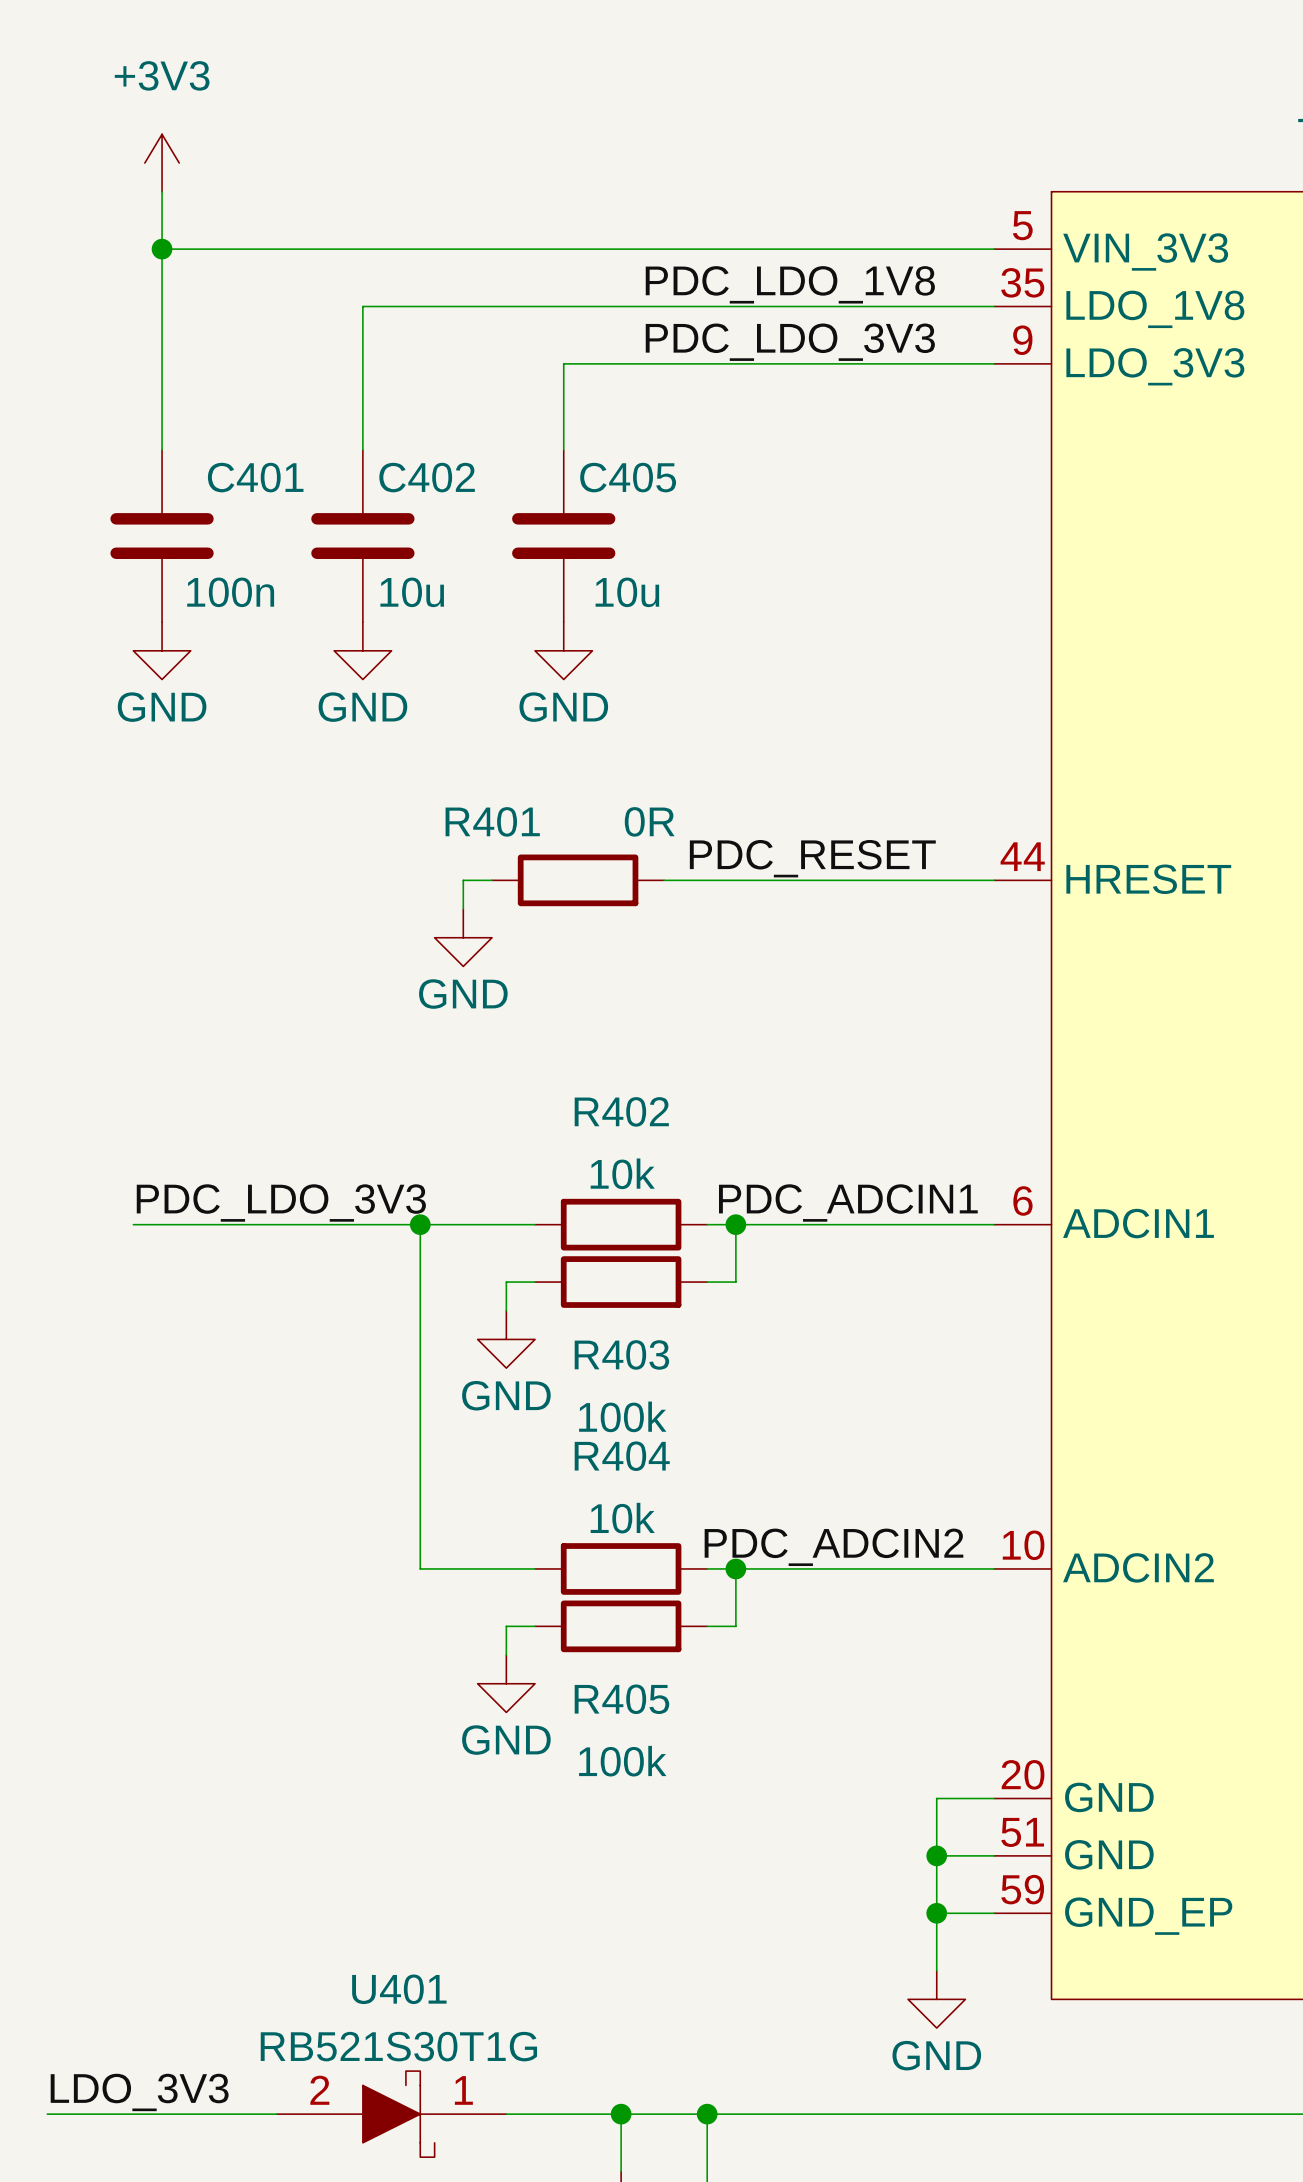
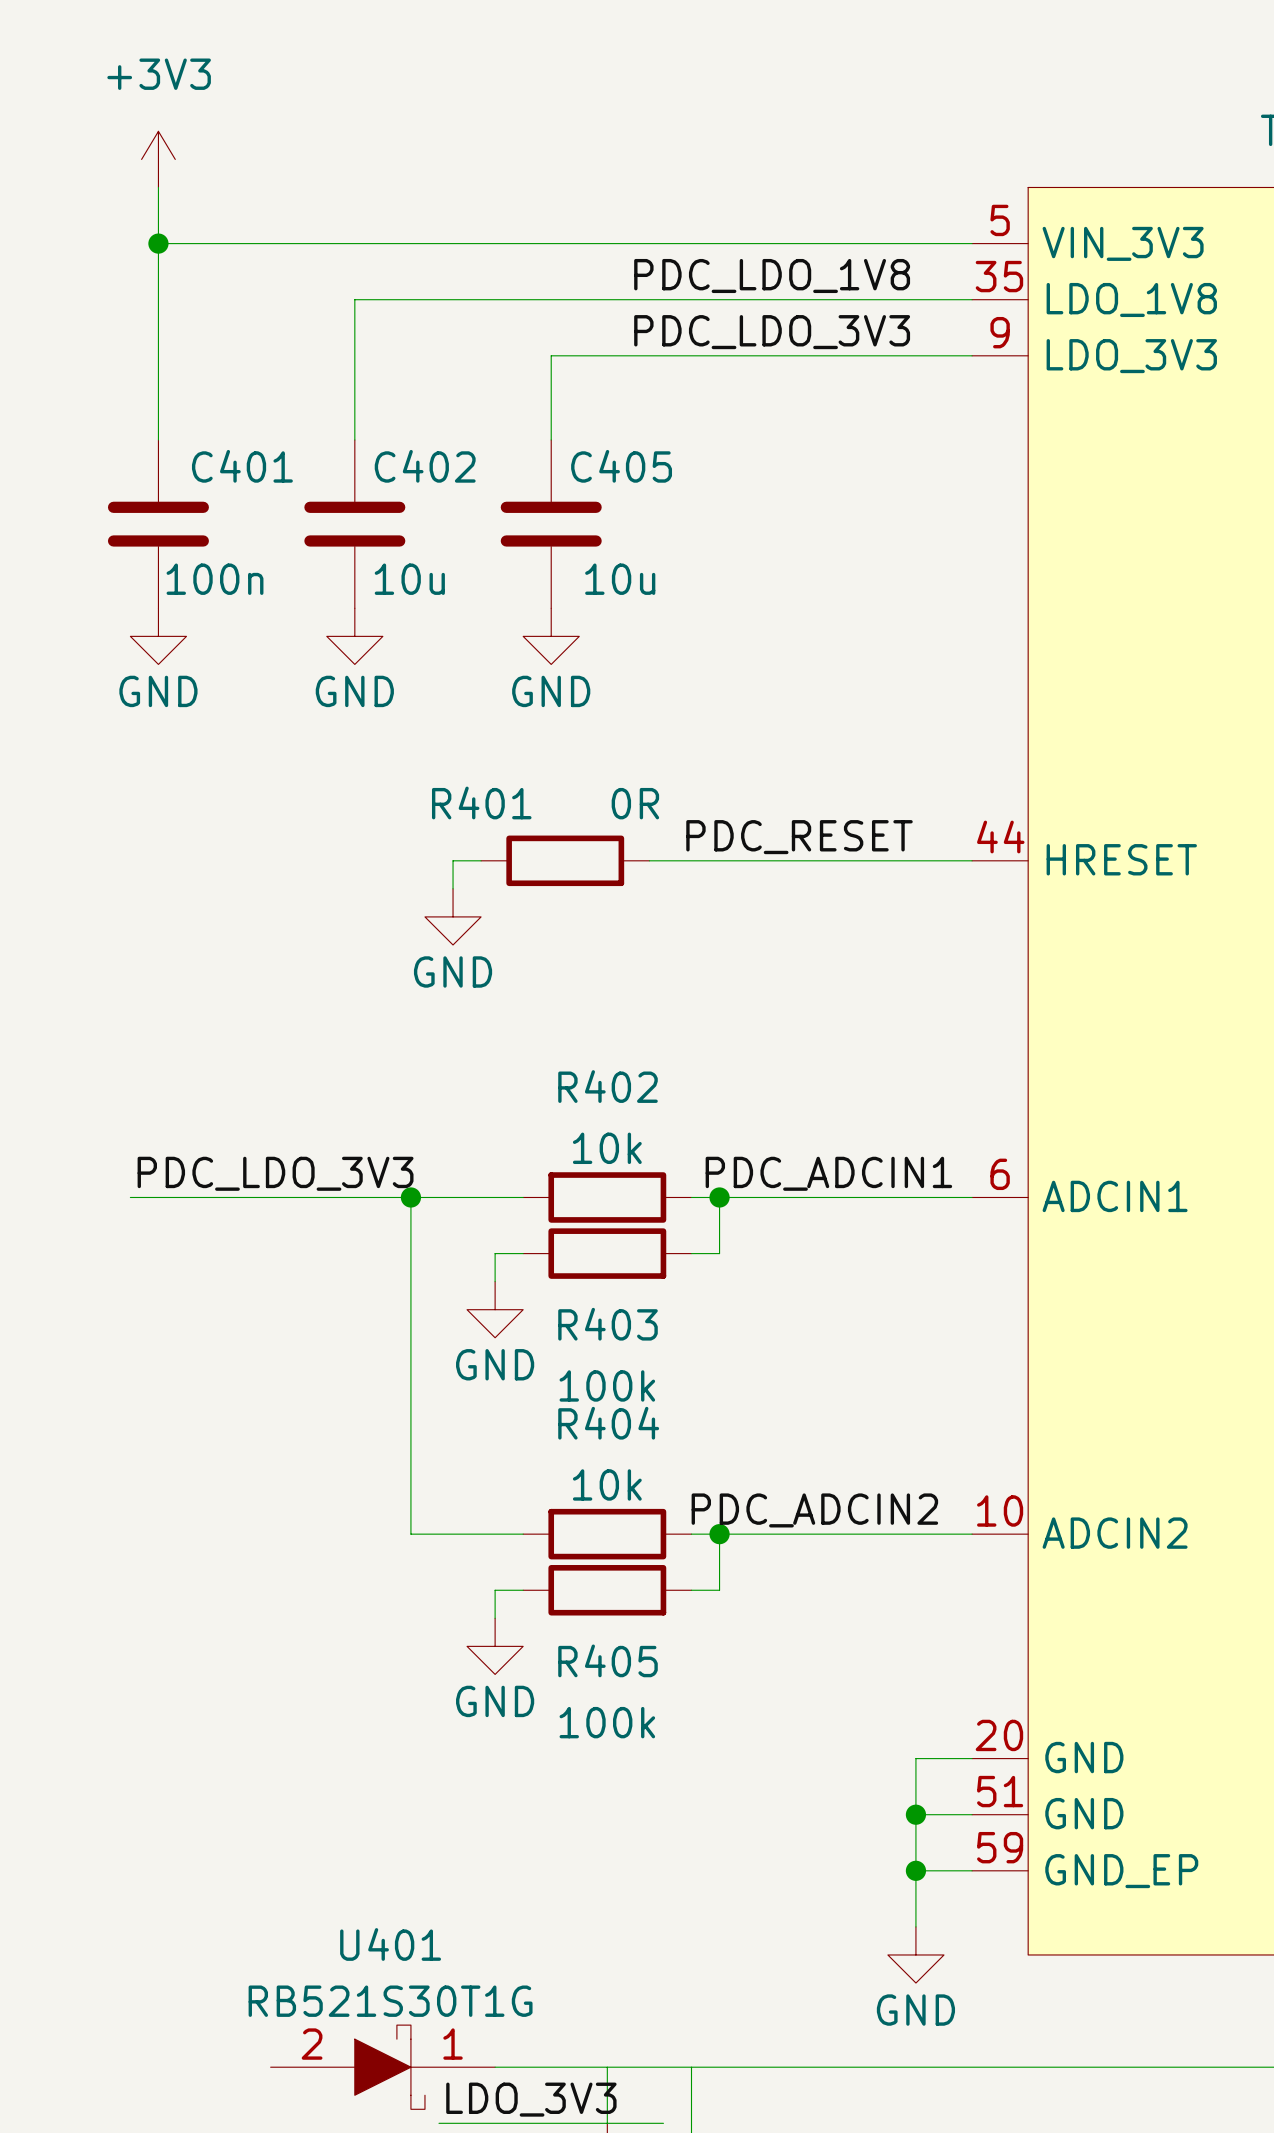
label position: LDO_3V3 (139, 2092) -> LDO_3V3 (531, 2099)
wire: (47, 2114) (276, 2114) -> (439, 2123) (663, 2123)
junction: (621, 2114) -> none
junction: (707, 2114) -> none

